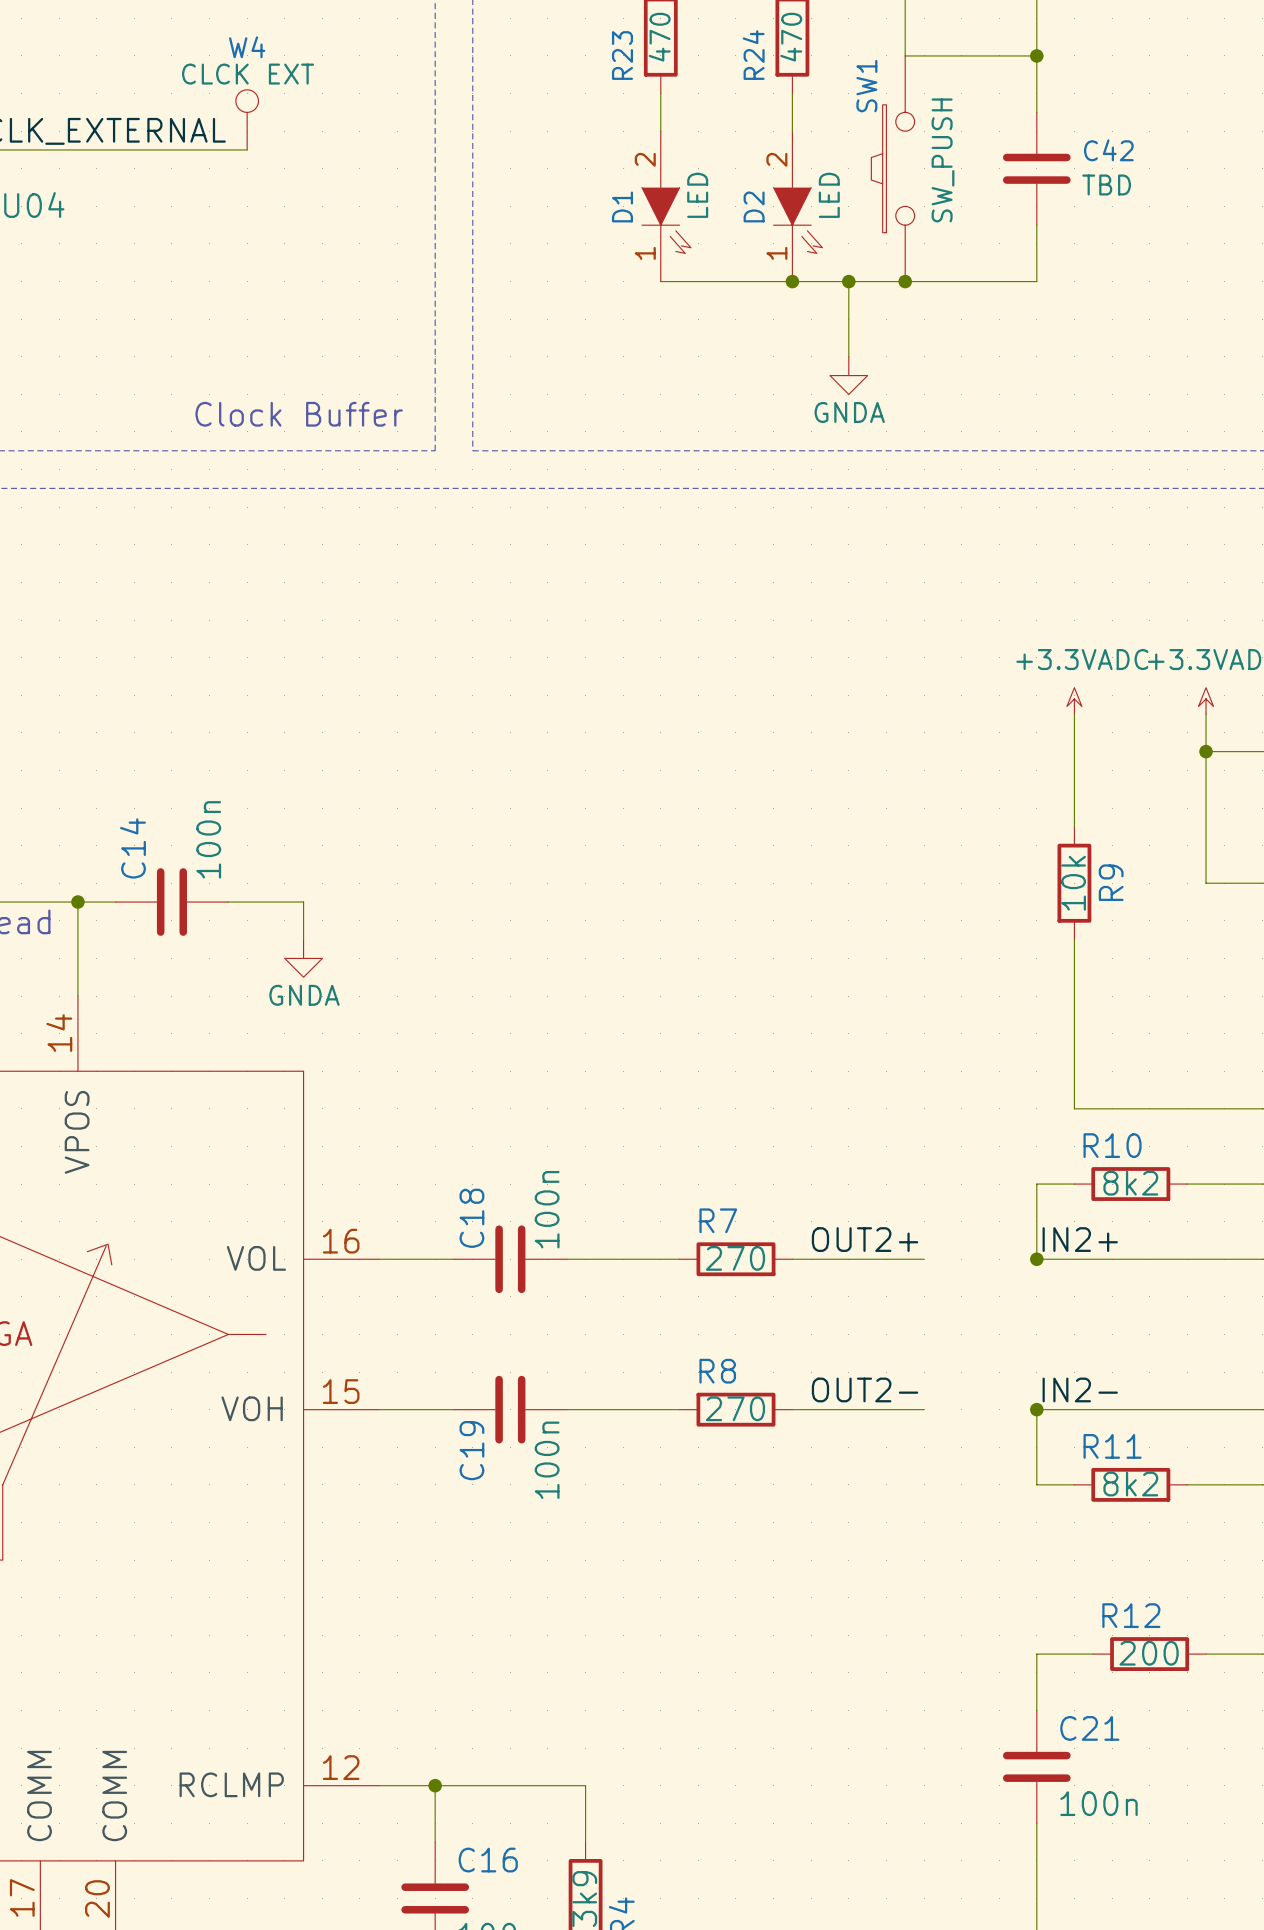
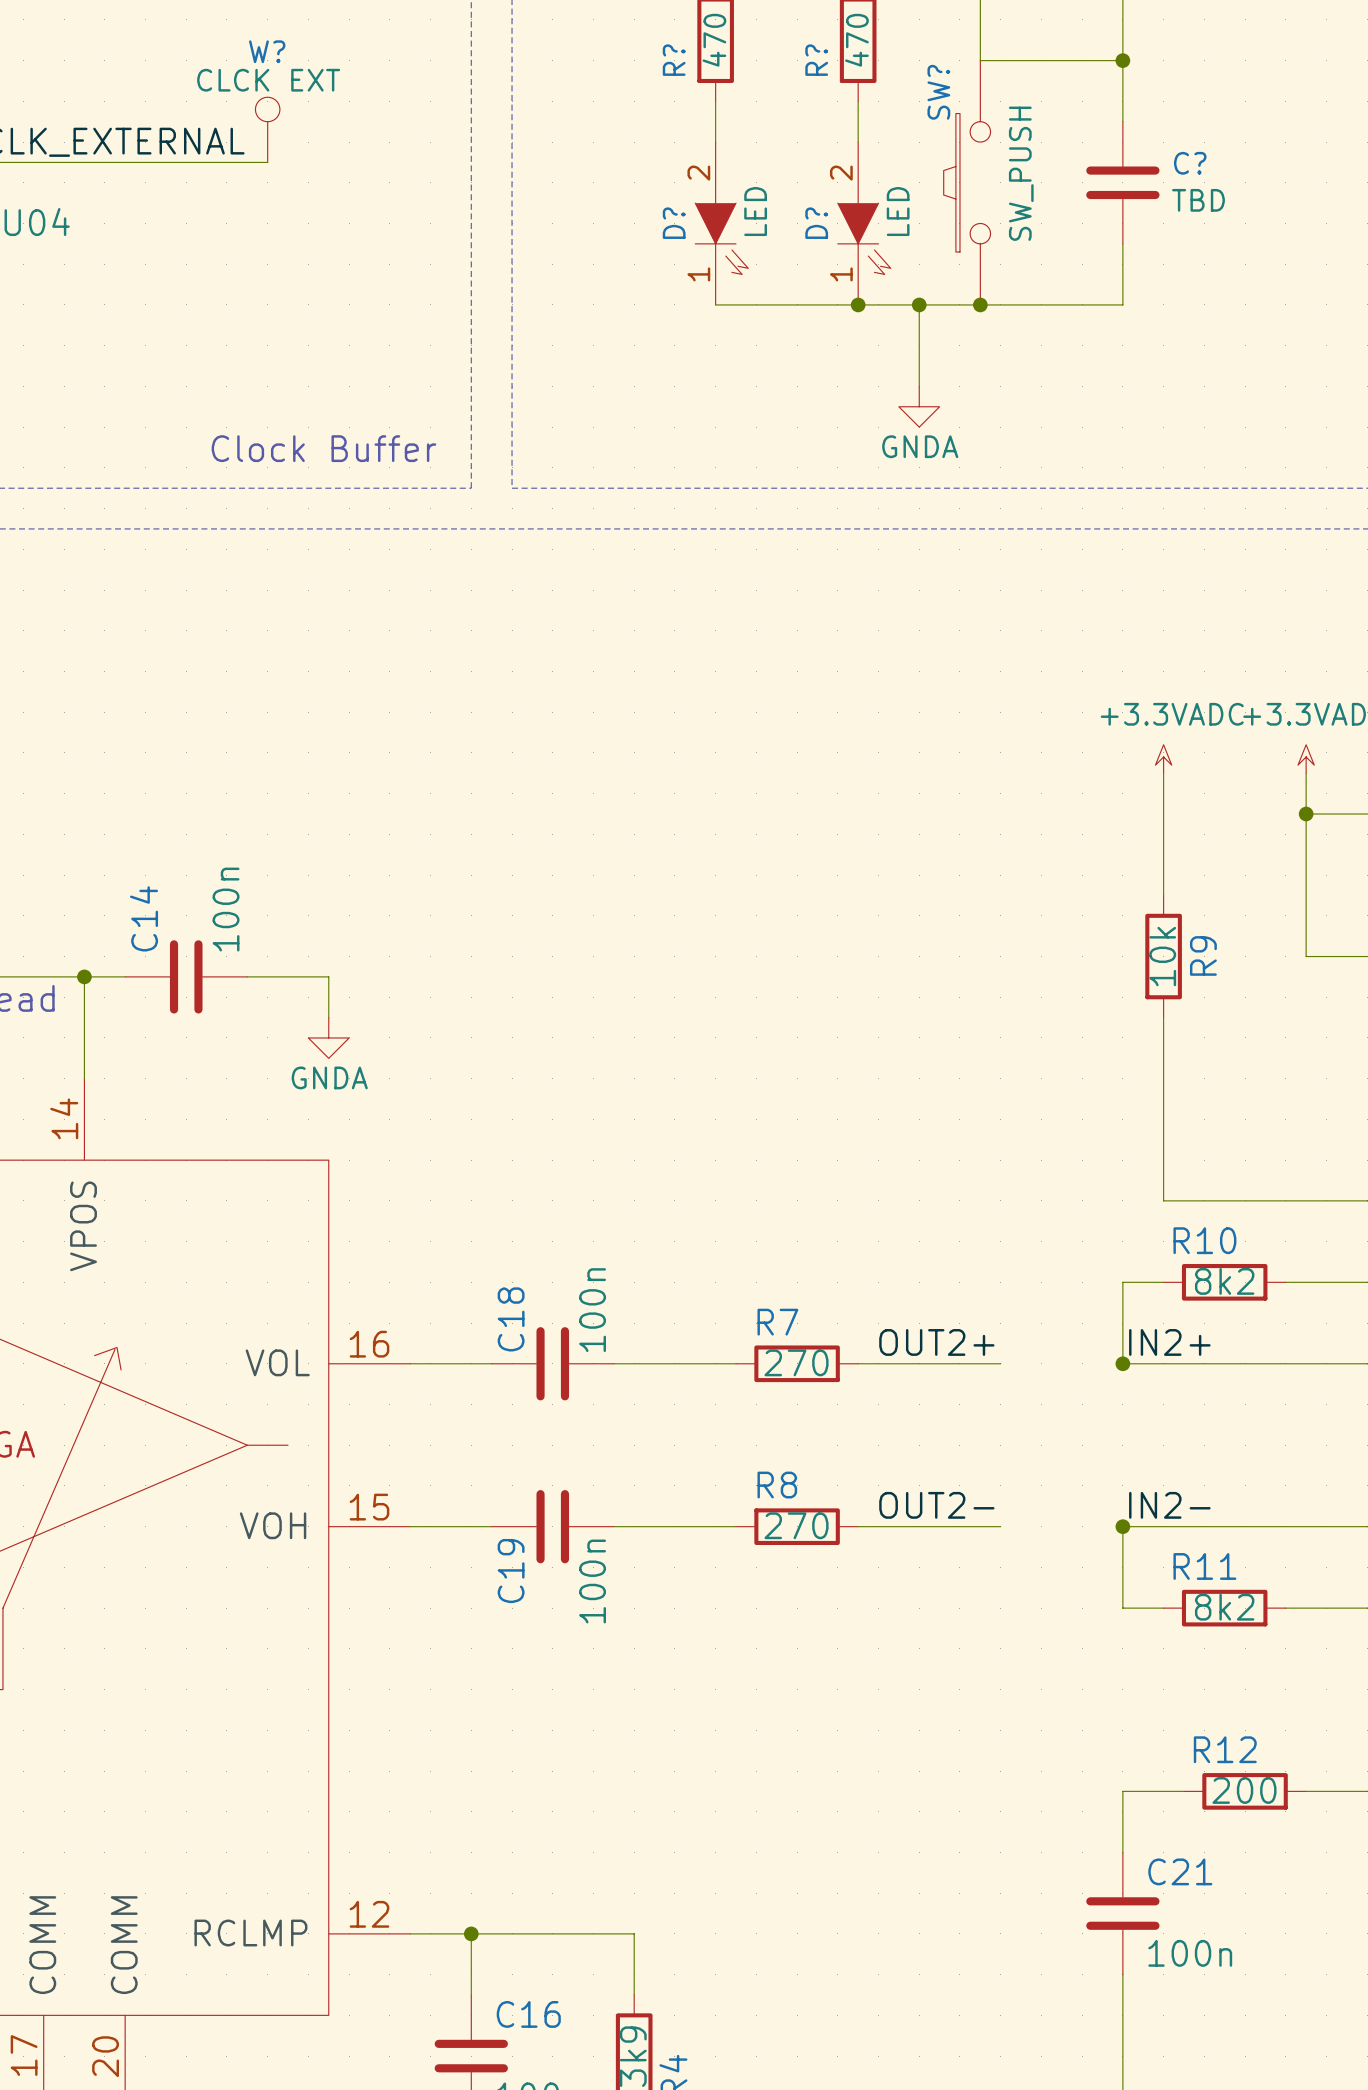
W4 name: W4 (247, 47) -> W? (267, 51)
R23 name: R23 (622, 55) -> R? (674, 60)
R24 name: R24 (753, 55) -> R? (816, 60)
SW1 name: SW1 (866, 86) -> SW? (938, 92)
C42 name: C42 (1108, 150) -> C? (1190, 163)
D1 name: D1 (622, 206) -> D? (674, 223)
D2 name: D2 (754, 206) -> D? (816, 223)

